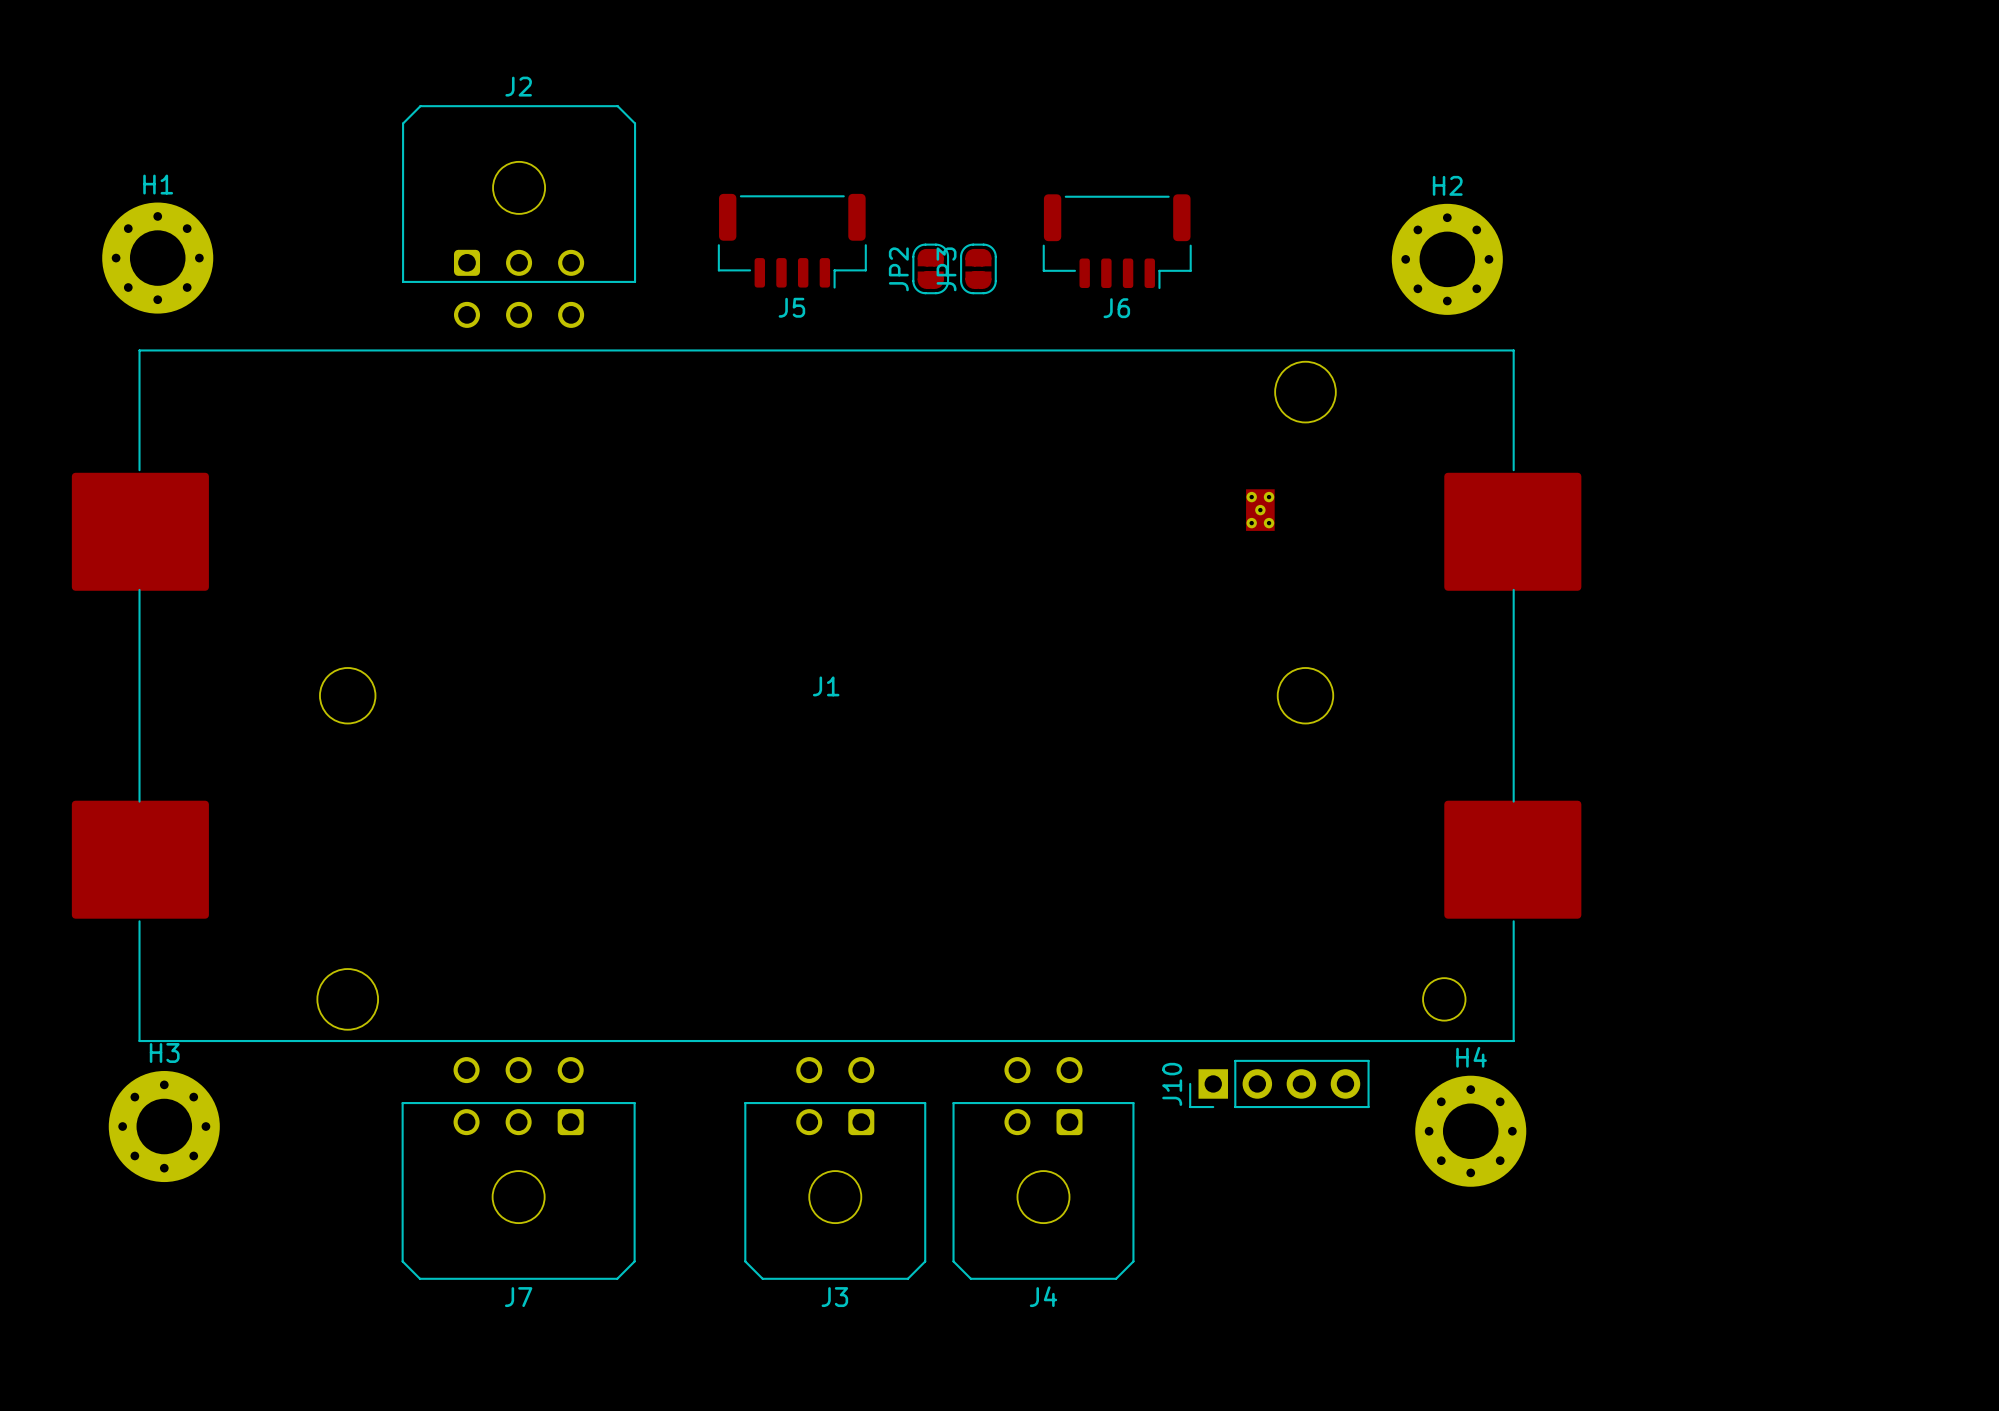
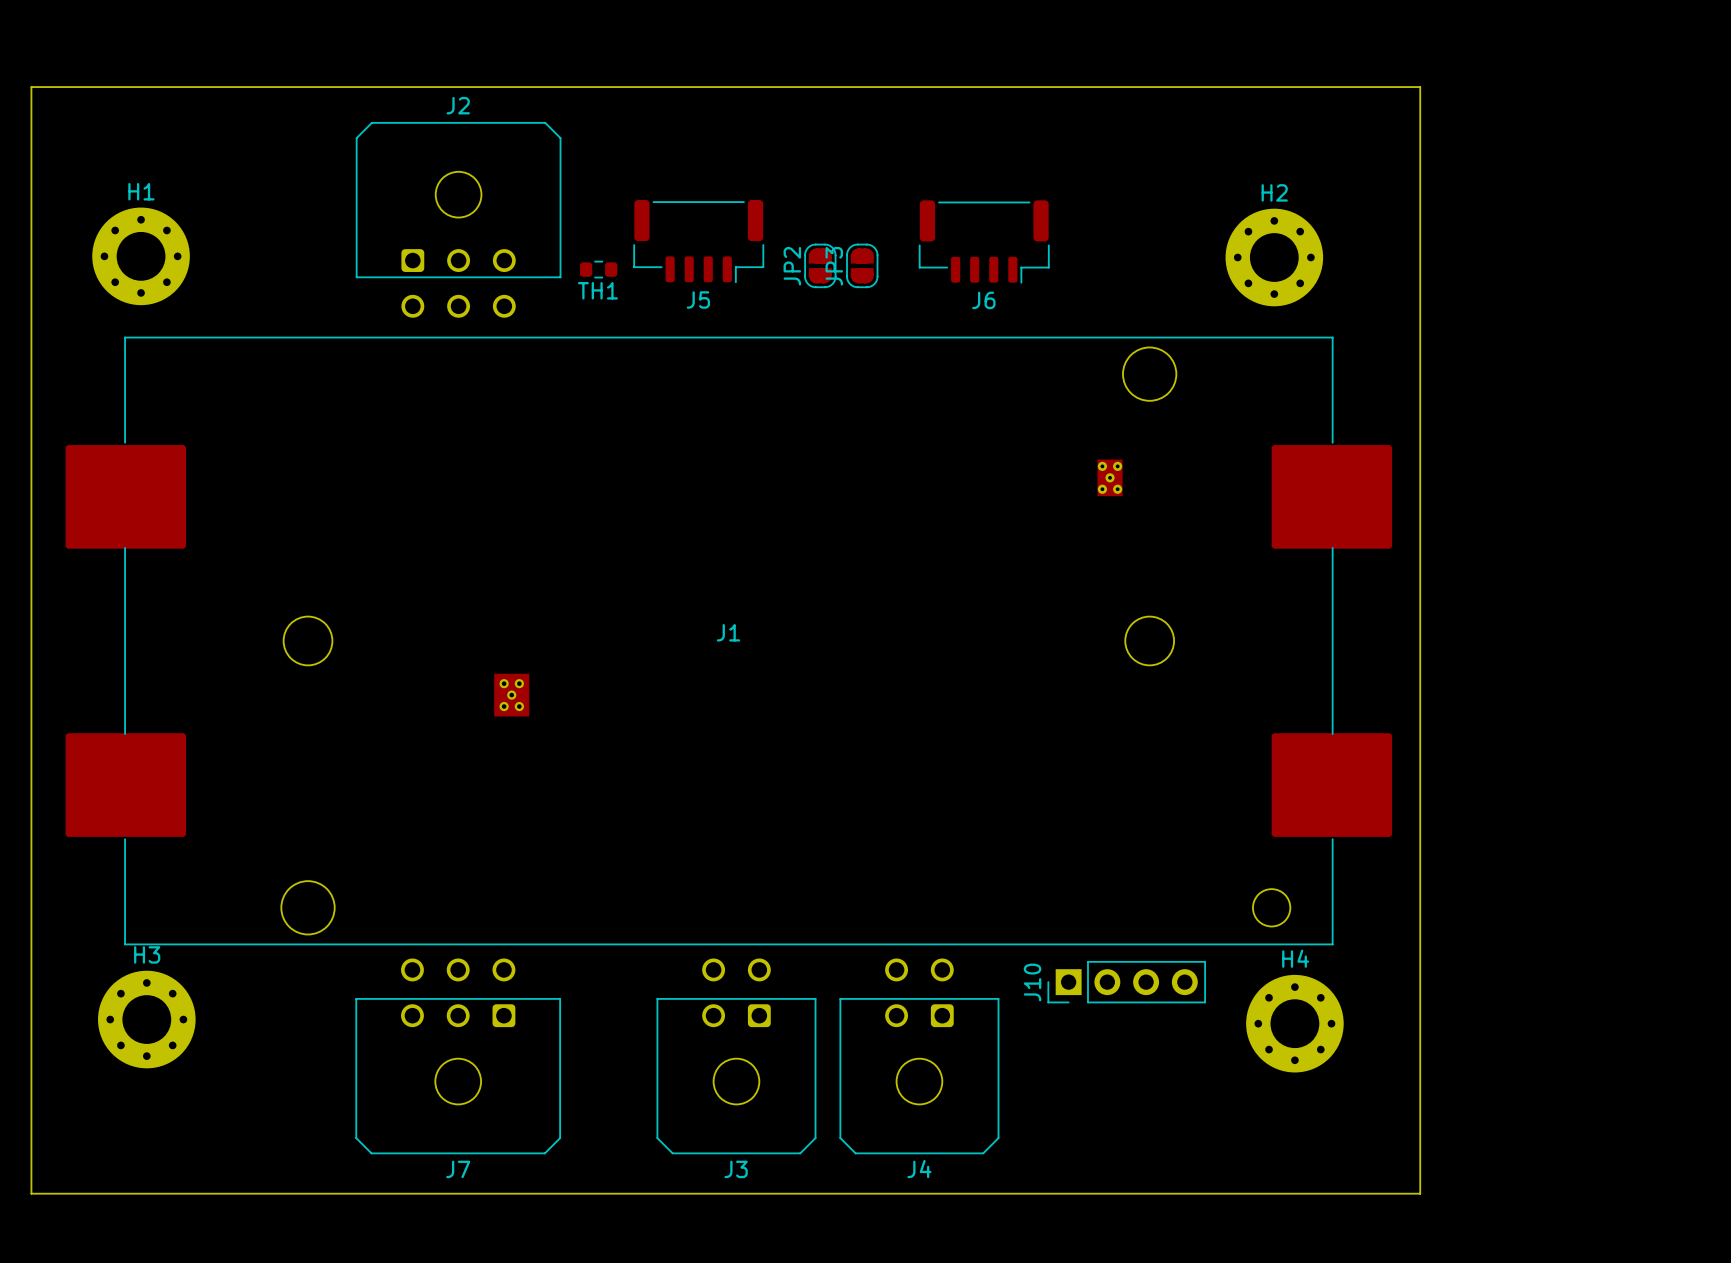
board edge: none -> (31, 87) (1420, 87) (1420, 1193) (31, 1193) (31, 87)
TH1: none -> (598, 269)
part: none -> (511, 695)

